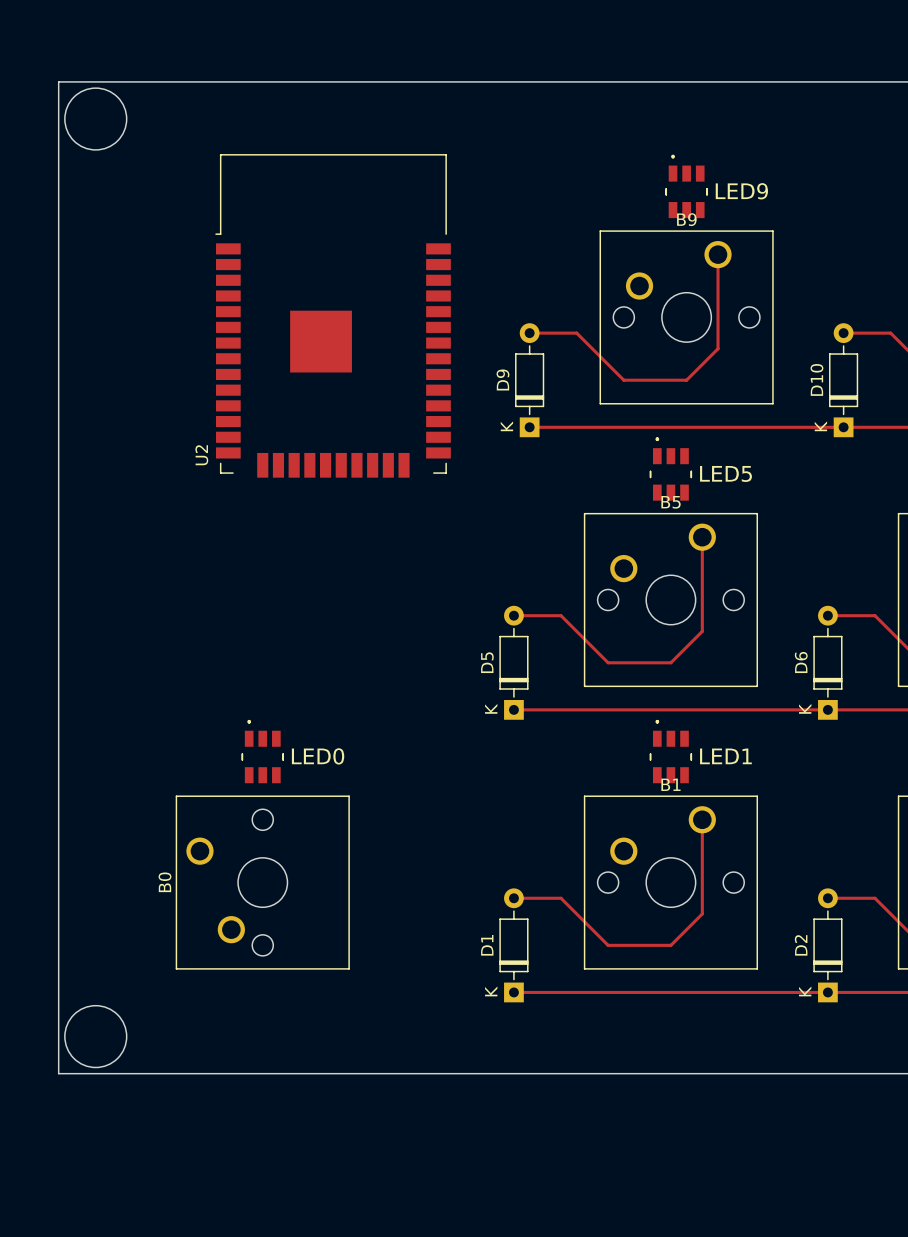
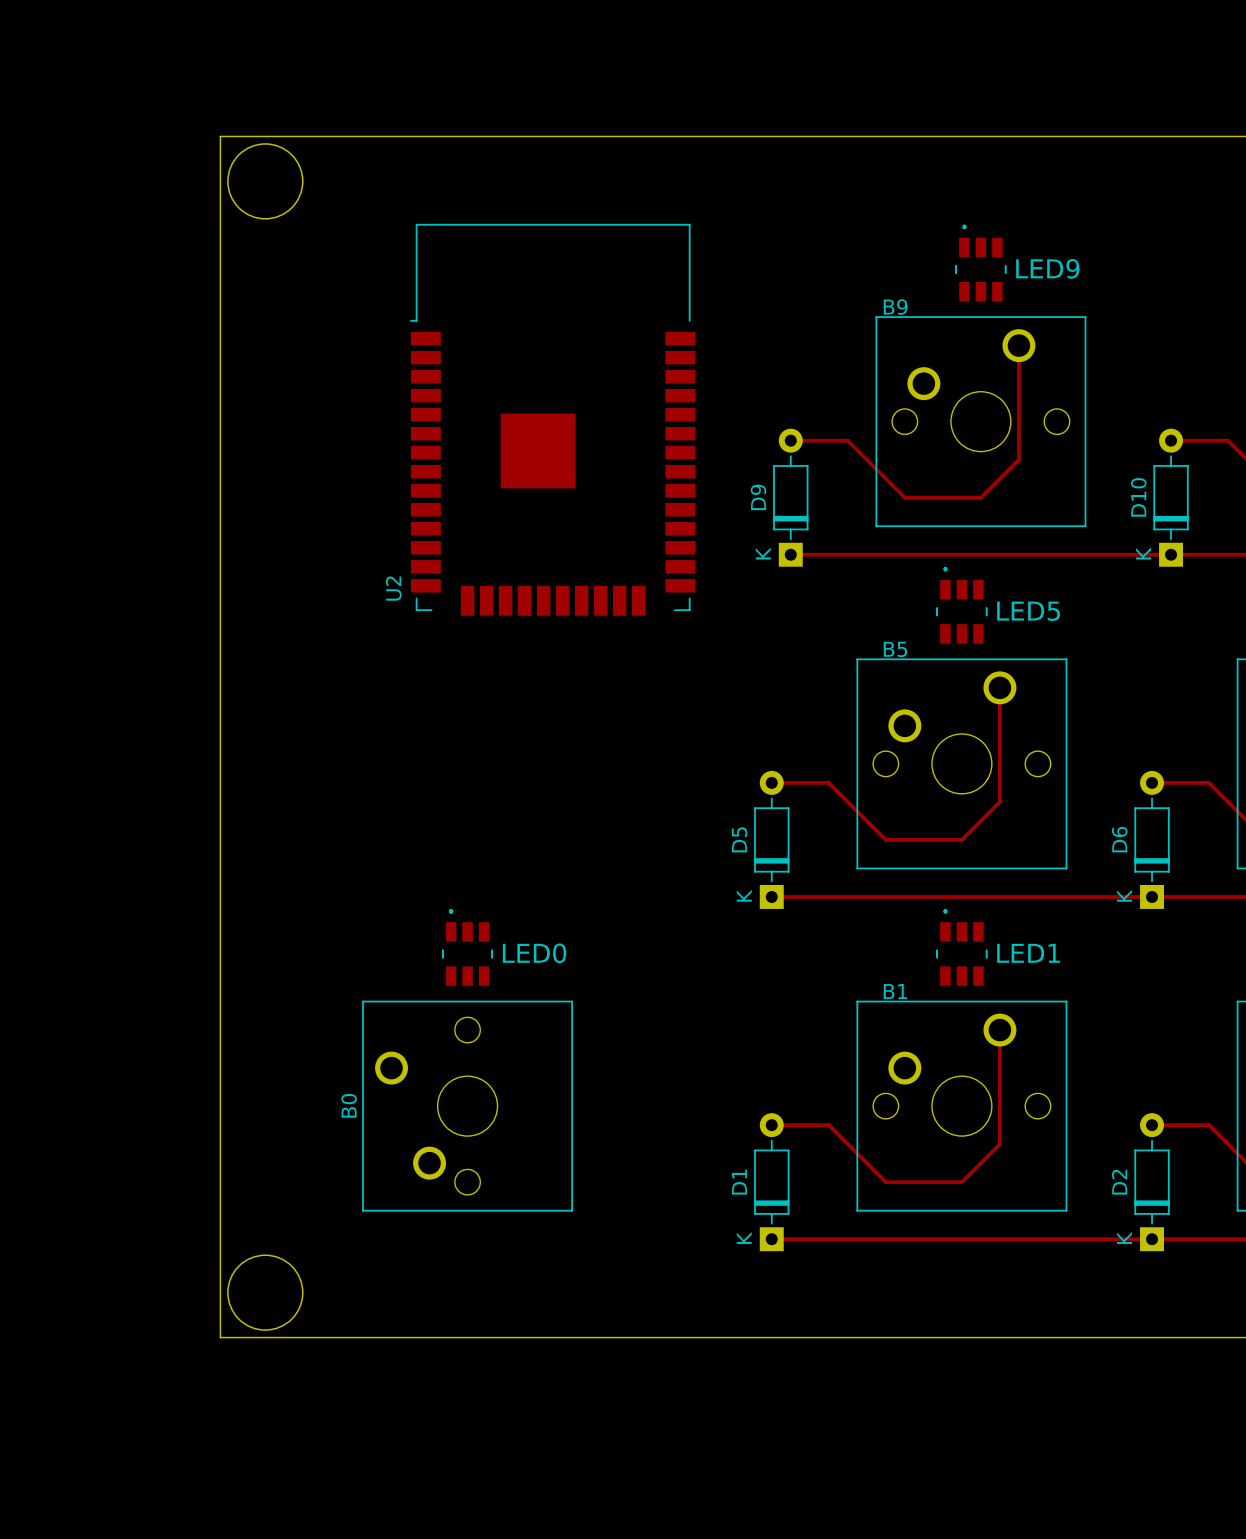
B9 name position: B9 (686, 219) -> B9 (895, 307)
B5 name position: B5 (671, 502) -> B5 (895, 649)
B1 name position: B1 (670, 784) -> B1 (895, 991)

